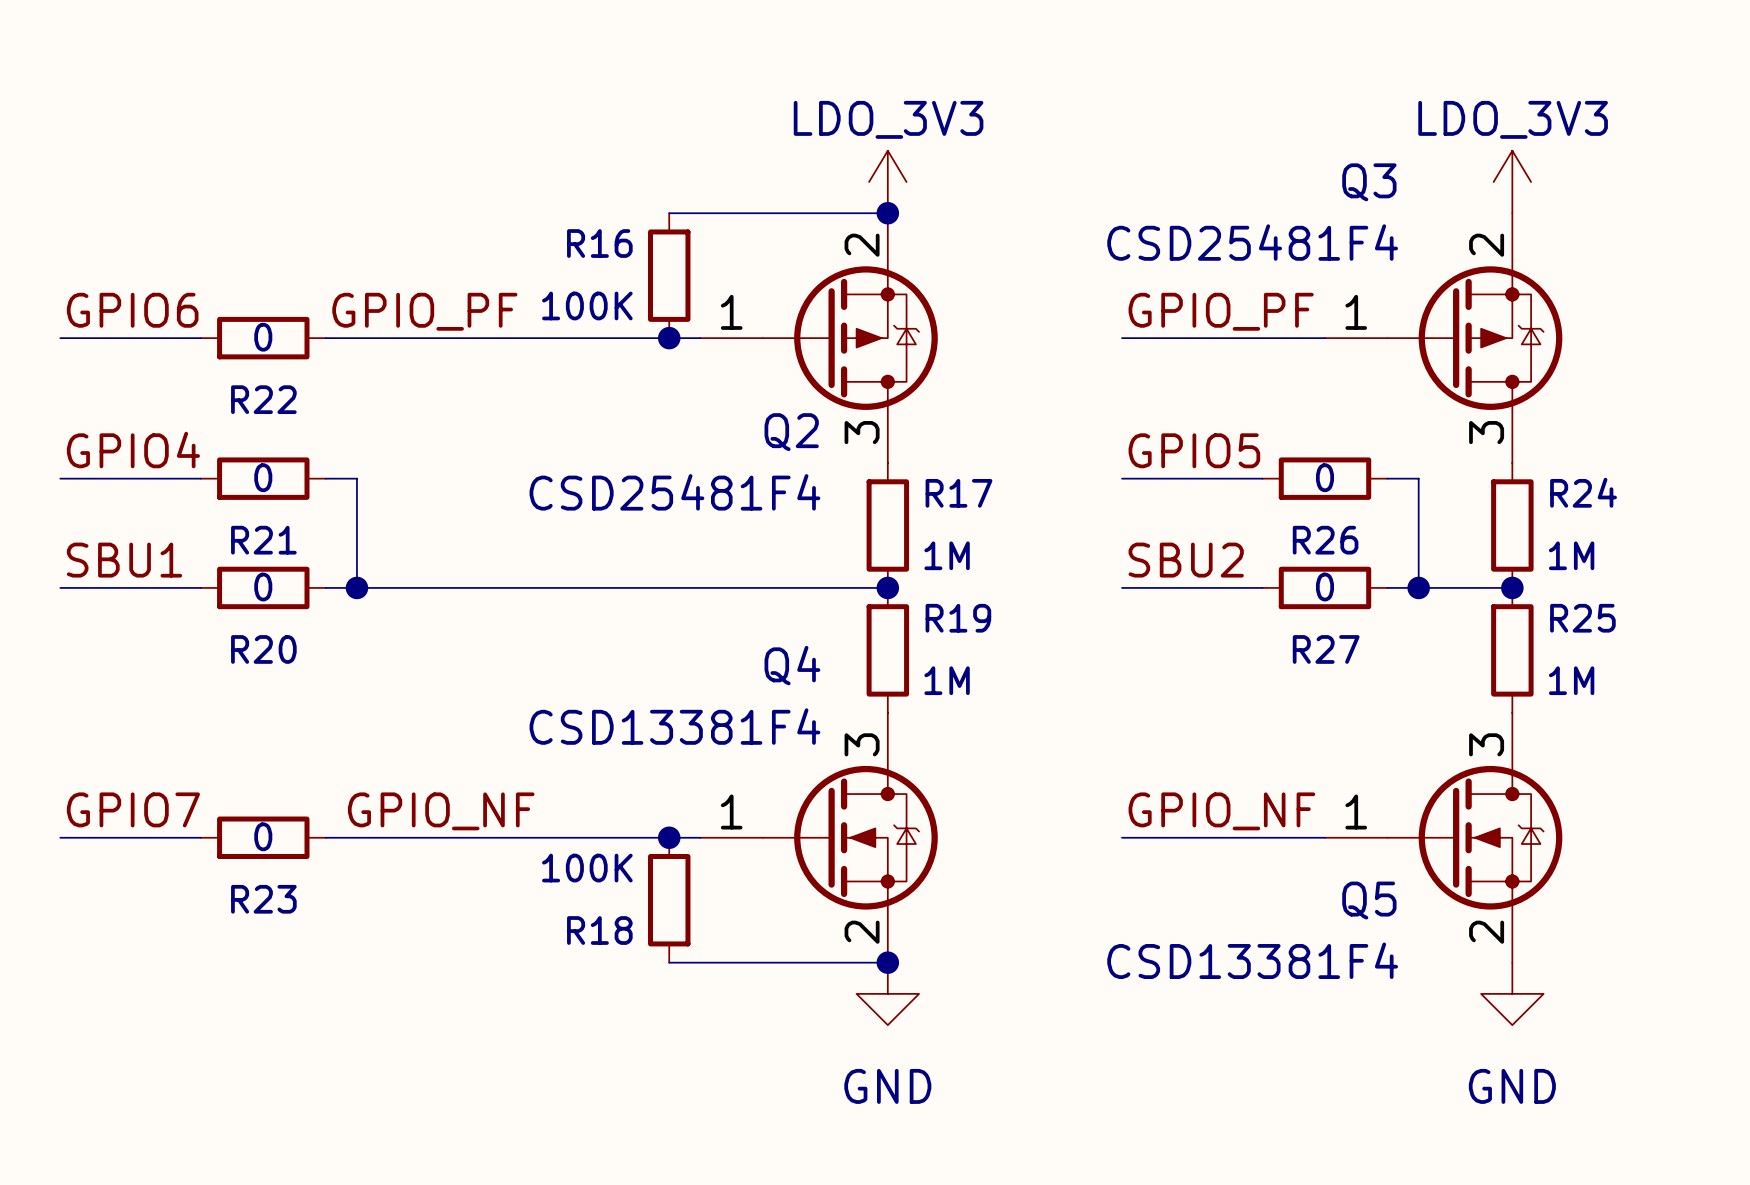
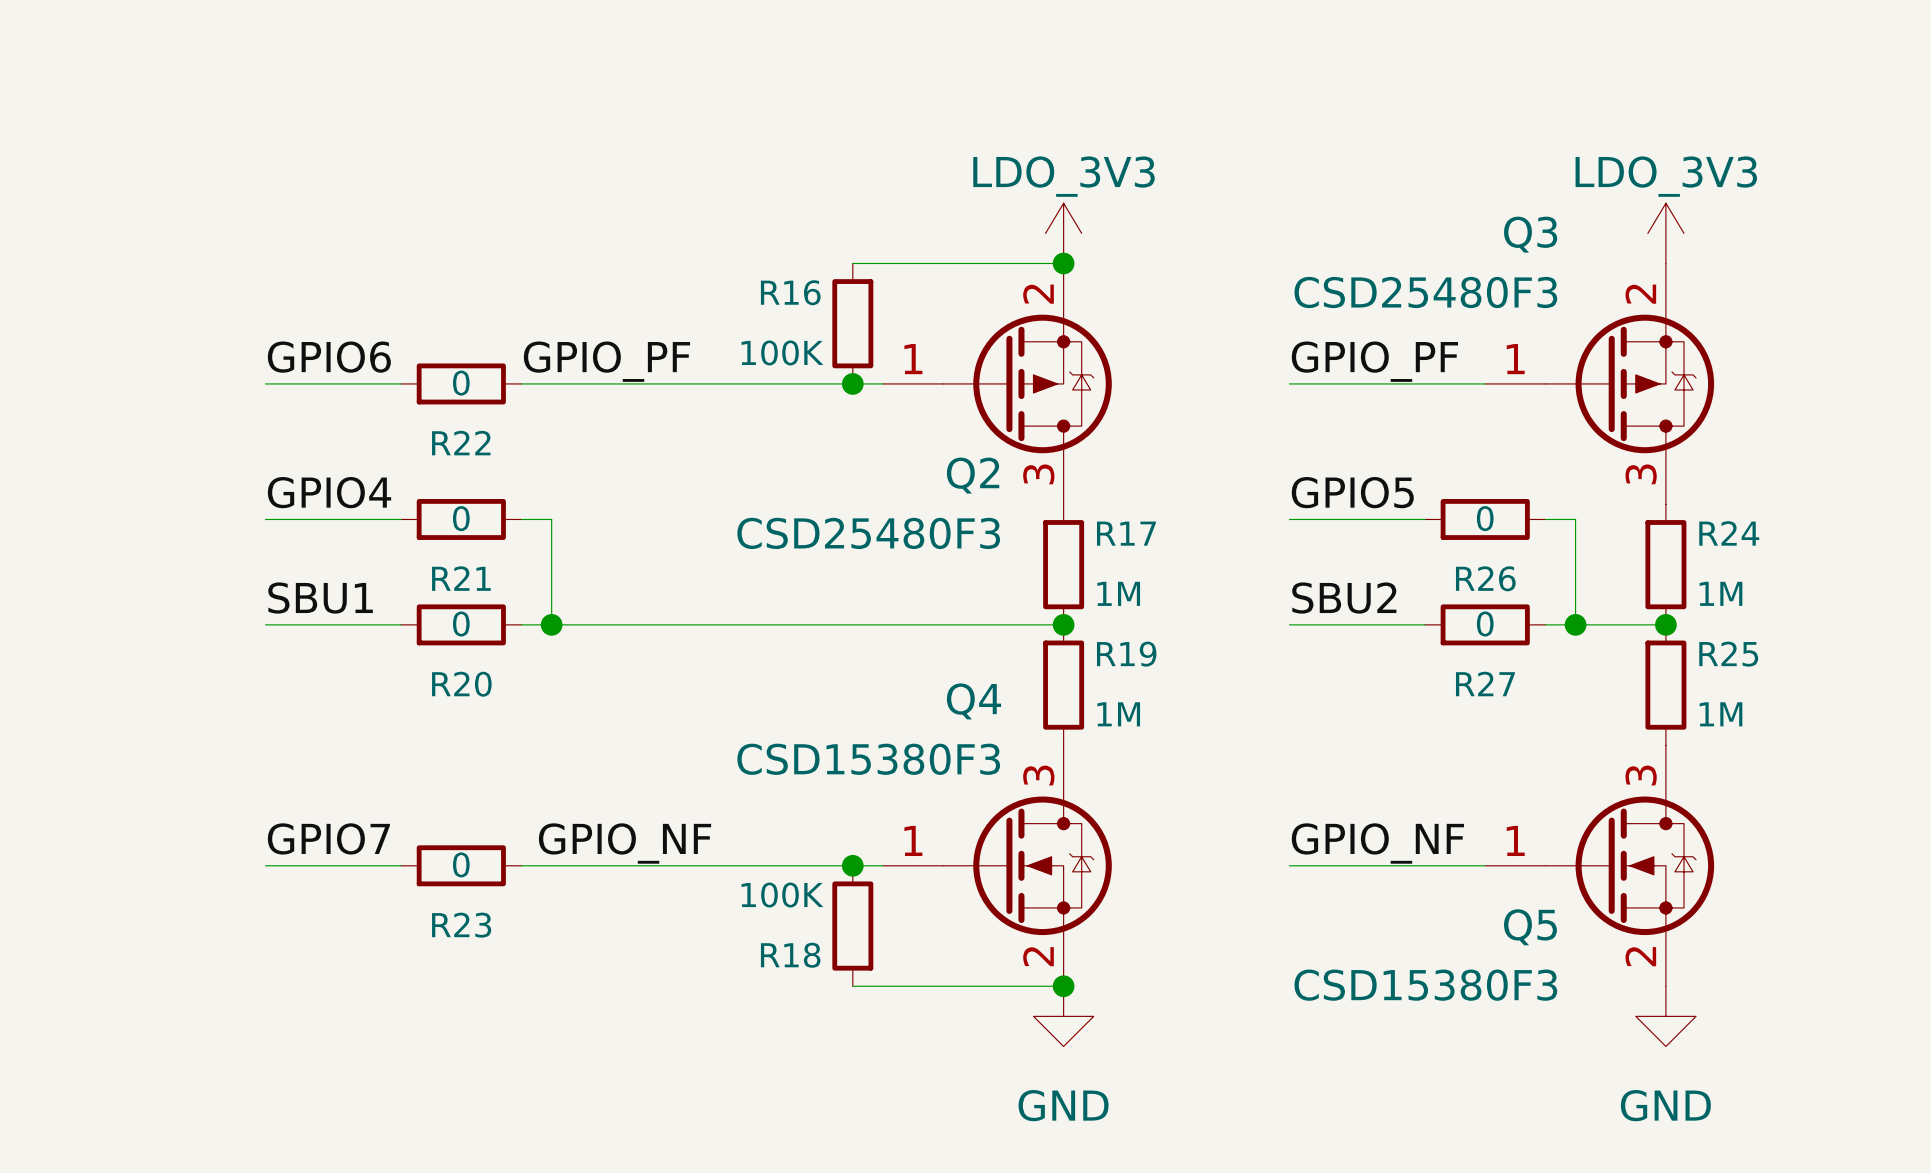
Q3 value: CSD25481F4 (1252, 242) -> CSD25480F3 (1425, 292)
Q2 value: CSD25481F4 (674, 492) -> CSD25480F3 (868, 533)
Q4 value: CSD13381F4 (674, 726) -> CSD15380F3 (868, 759)
Q5 value: CSD13381F4 (1252, 960) -> CSD15380F3 (1425, 985)

